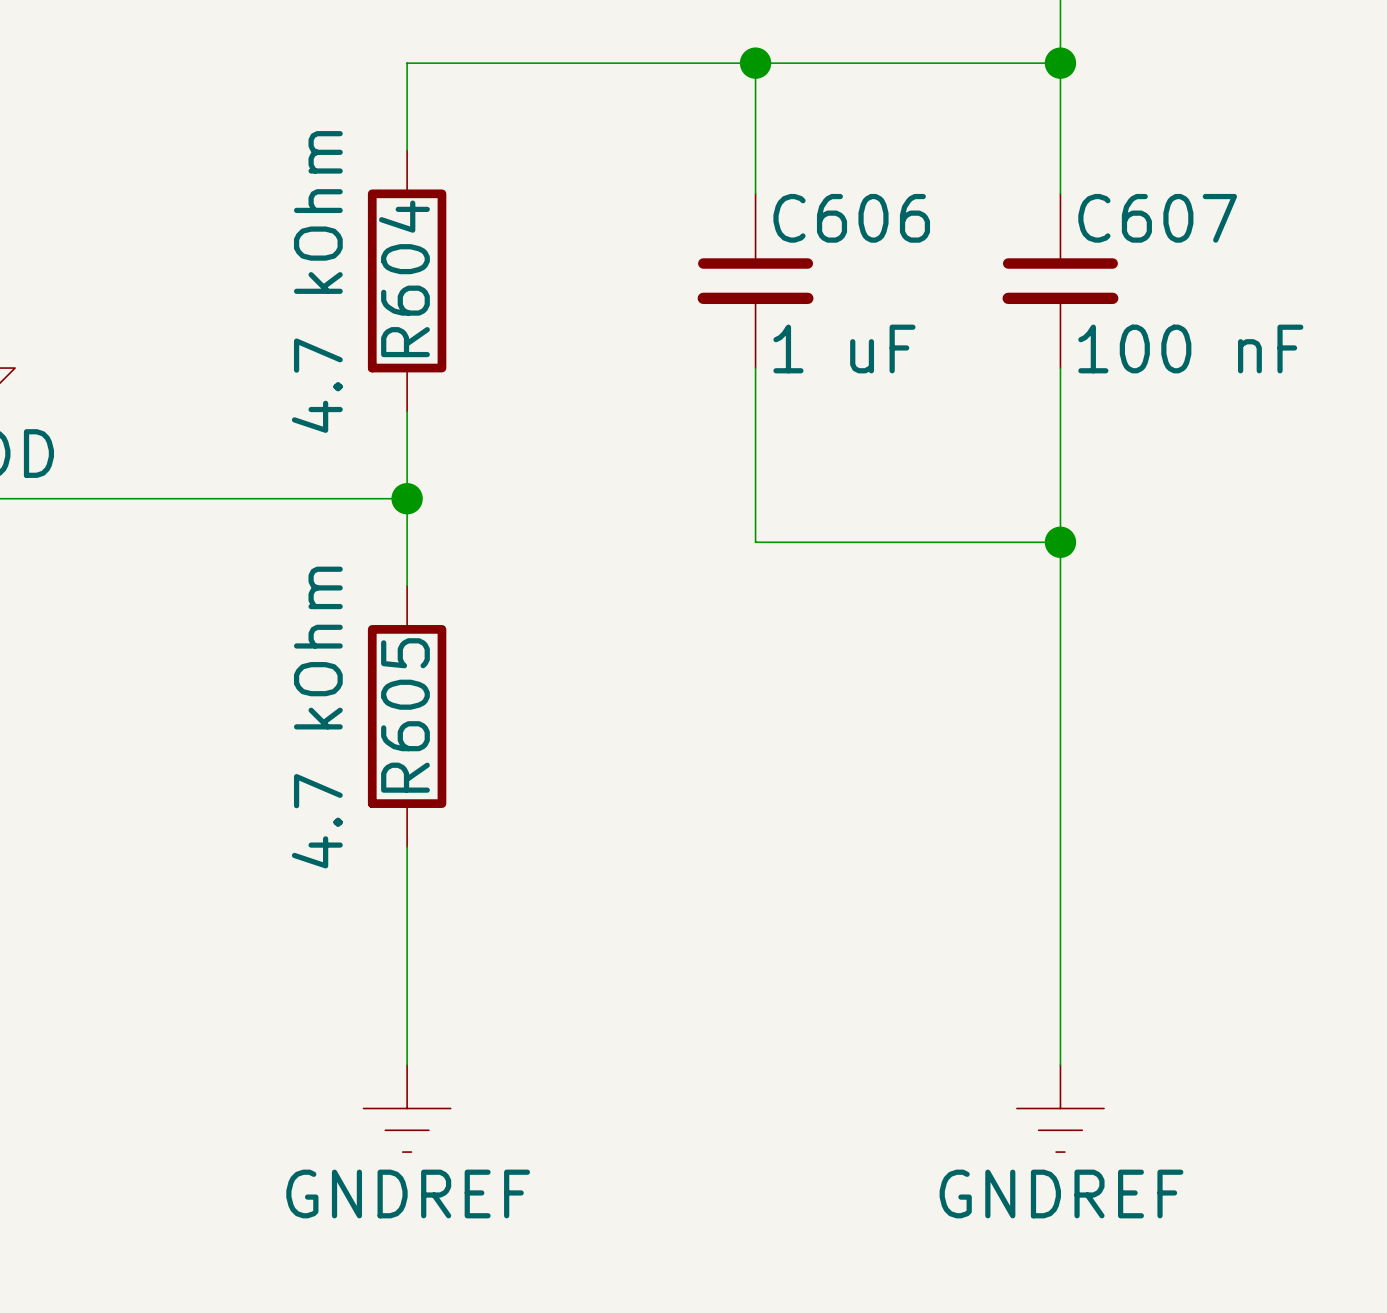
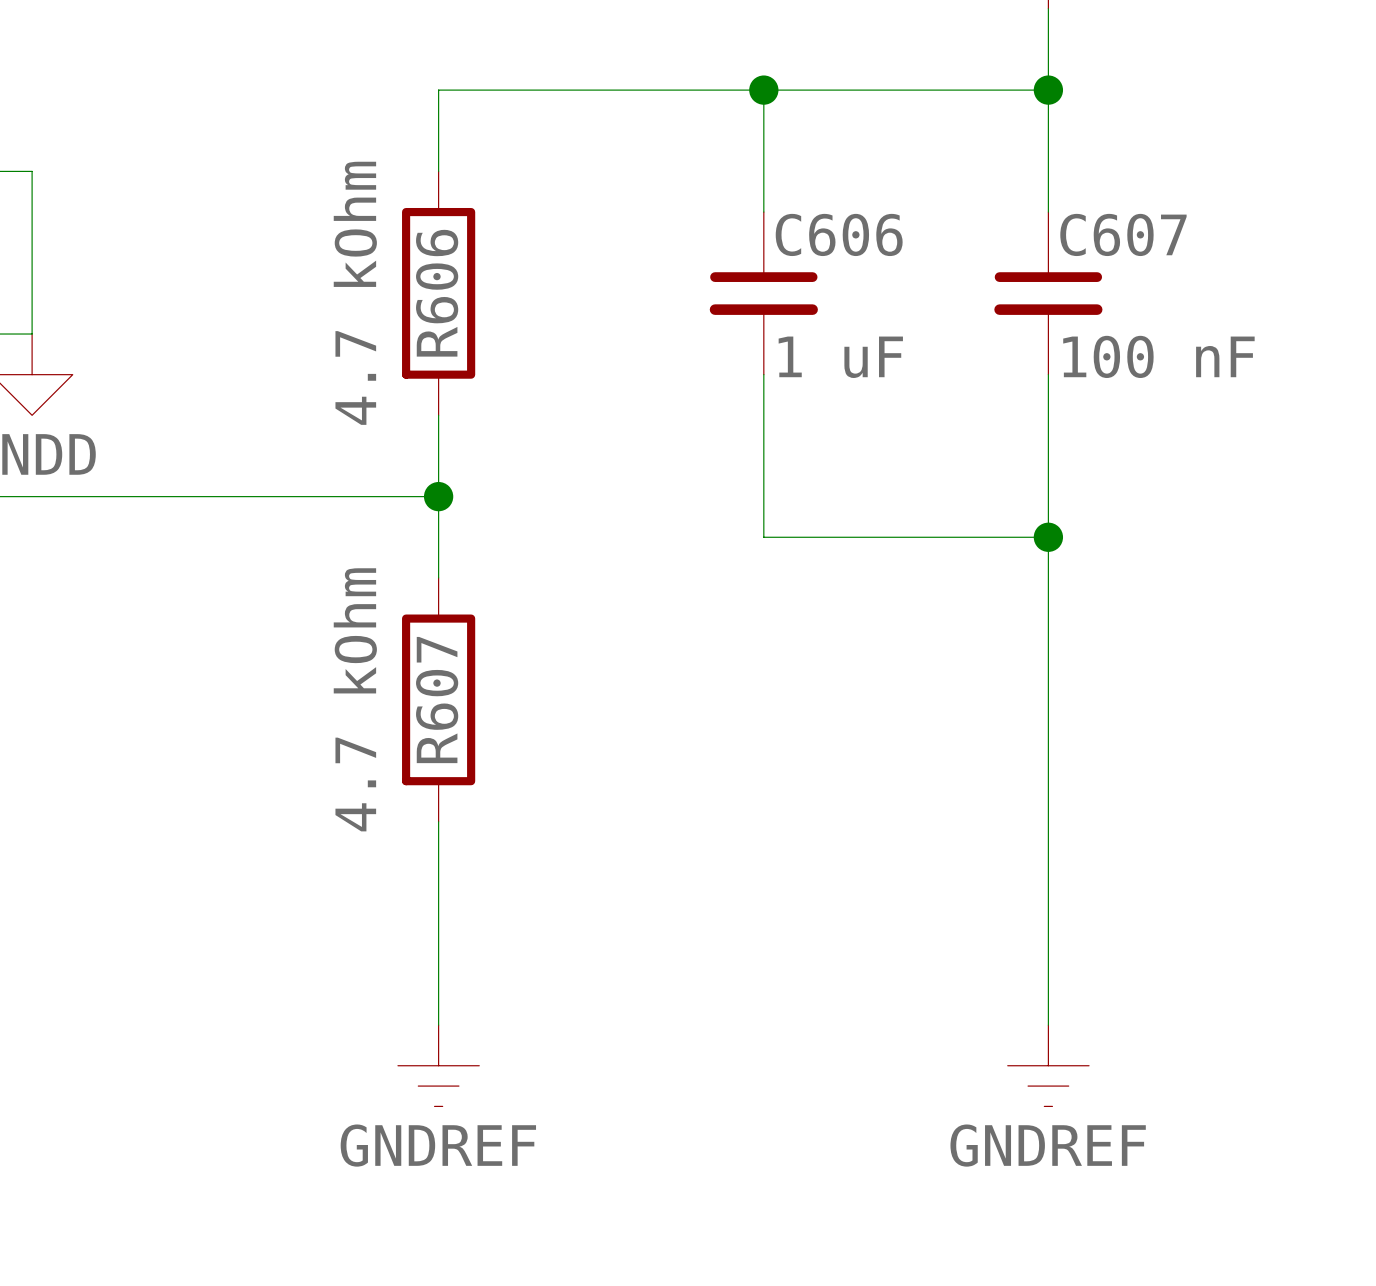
R604 name: R604 (404, 278) -> R606 (437, 293)
R605 name: R605 (405, 715) -> R607 (437, 700)

